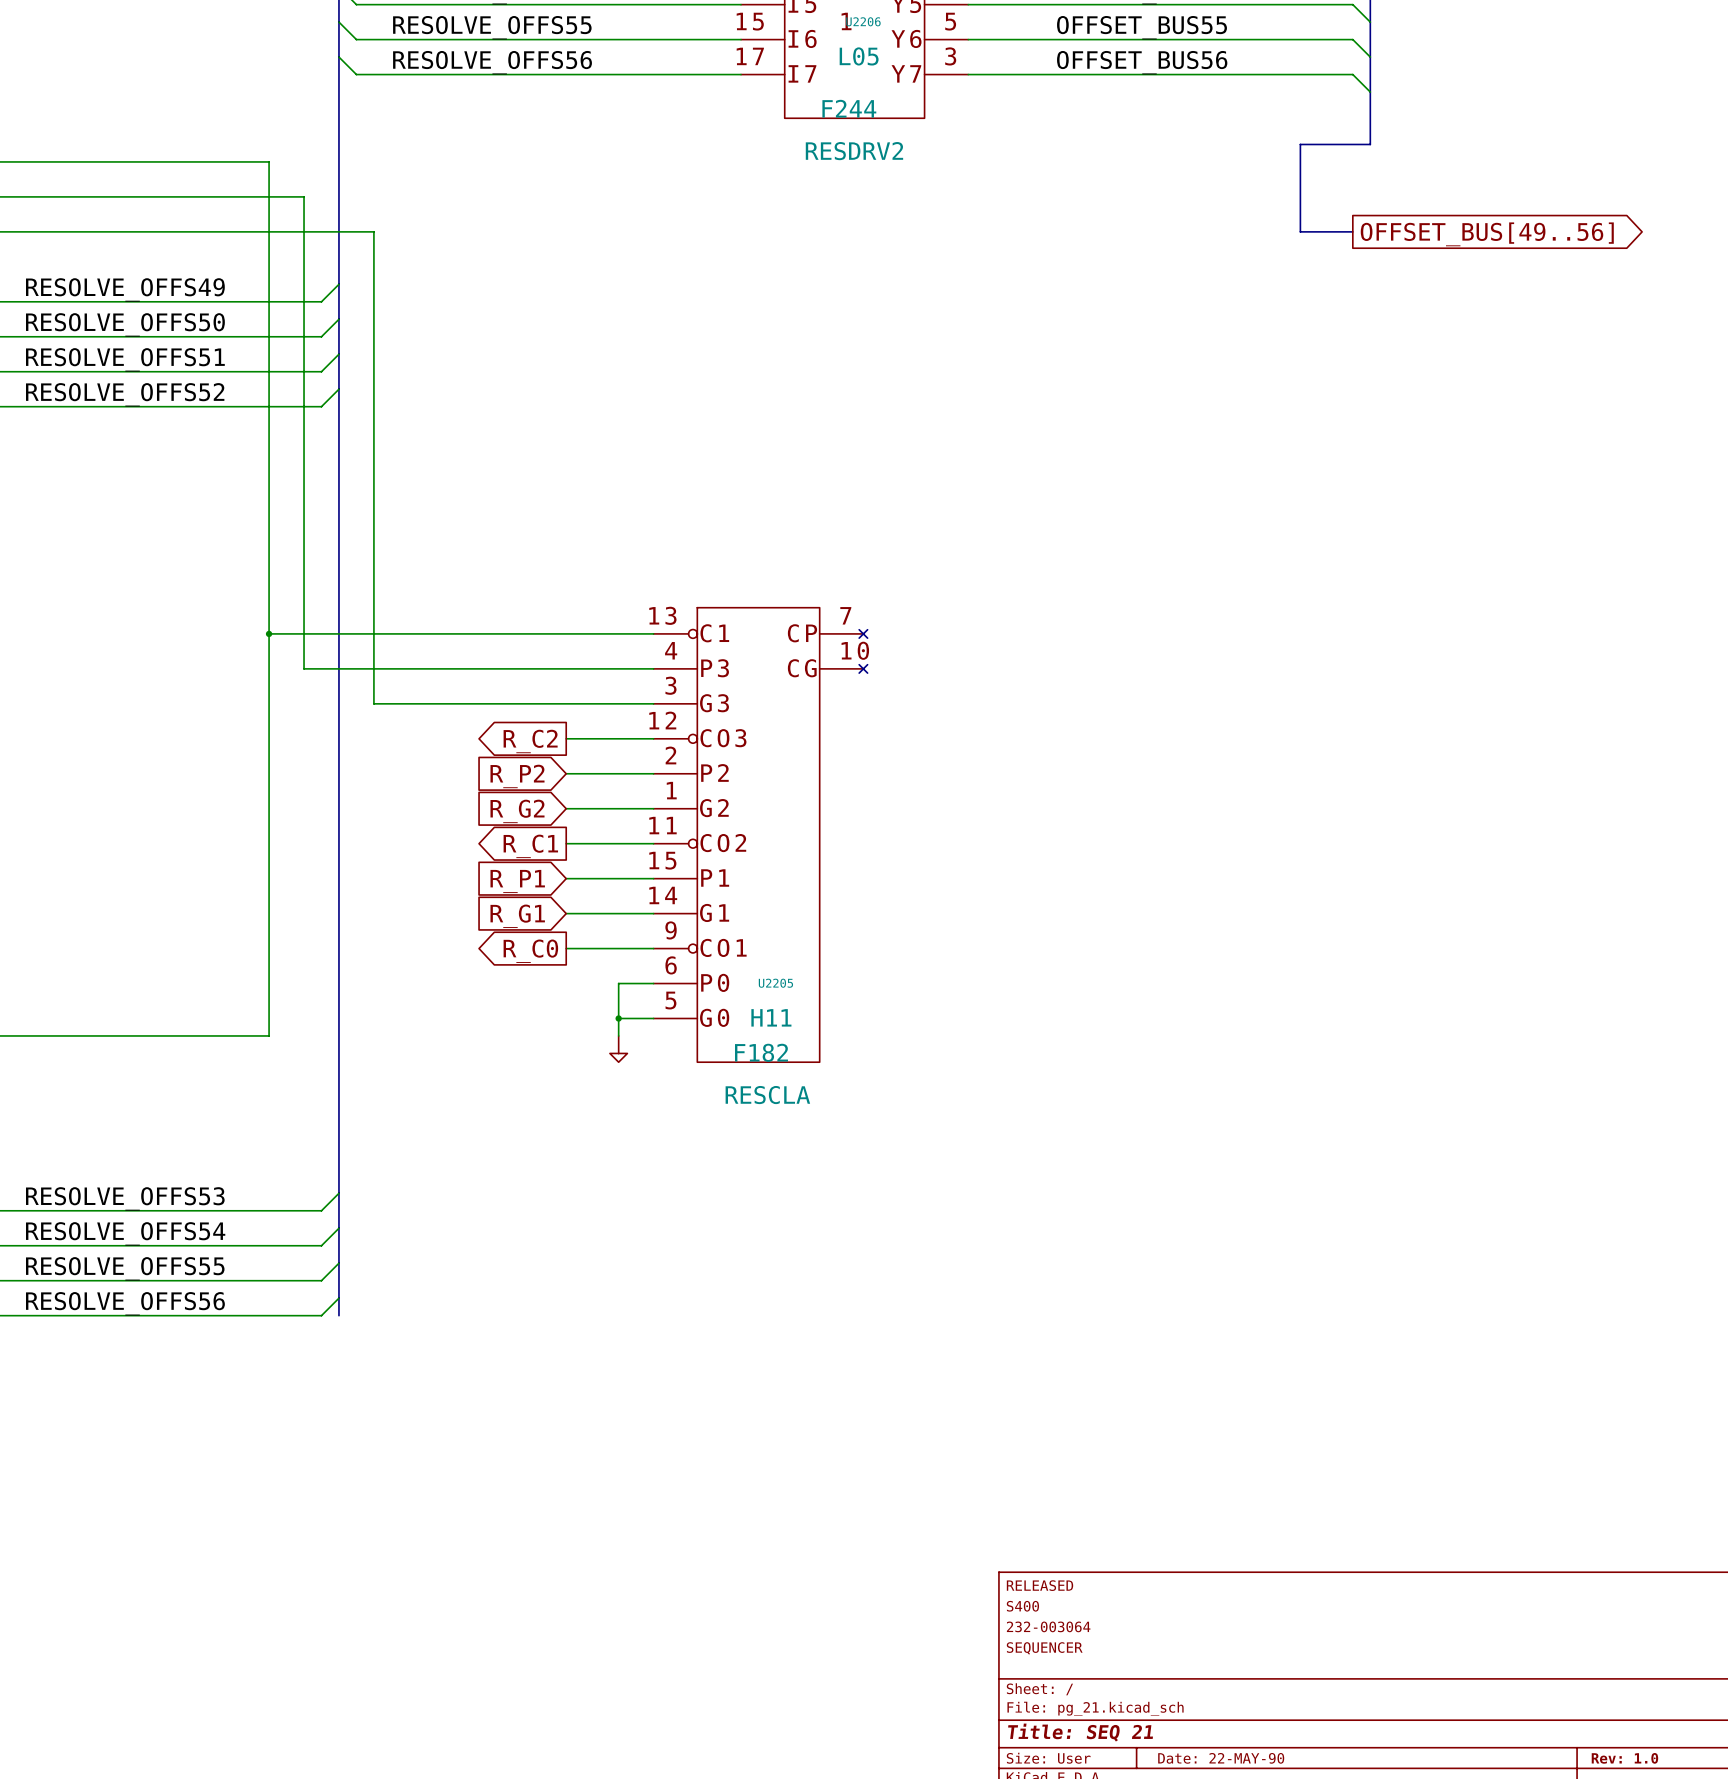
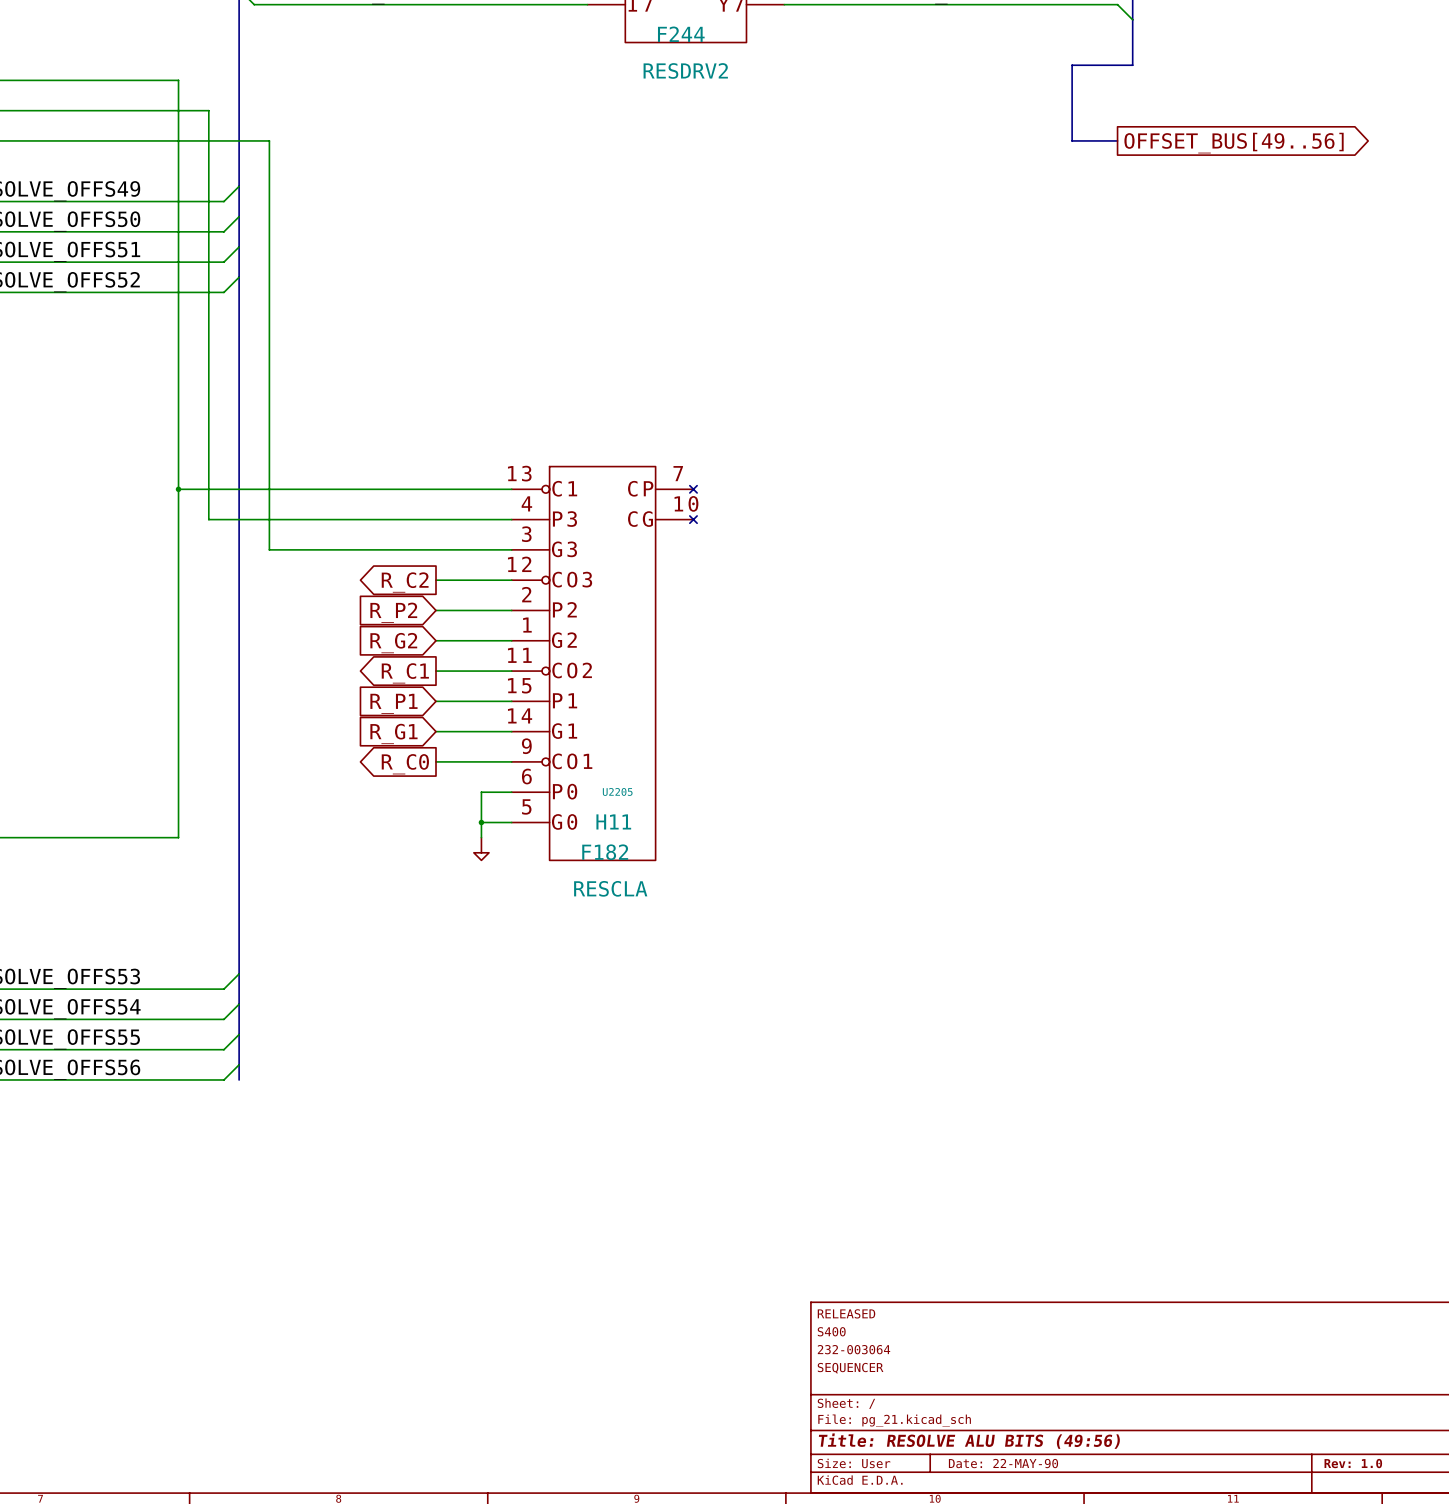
title block: Title: SEQ 21 (1080, 1732) -> Title: RESOLVE ALU BITS (49:56) (969, 1441)

